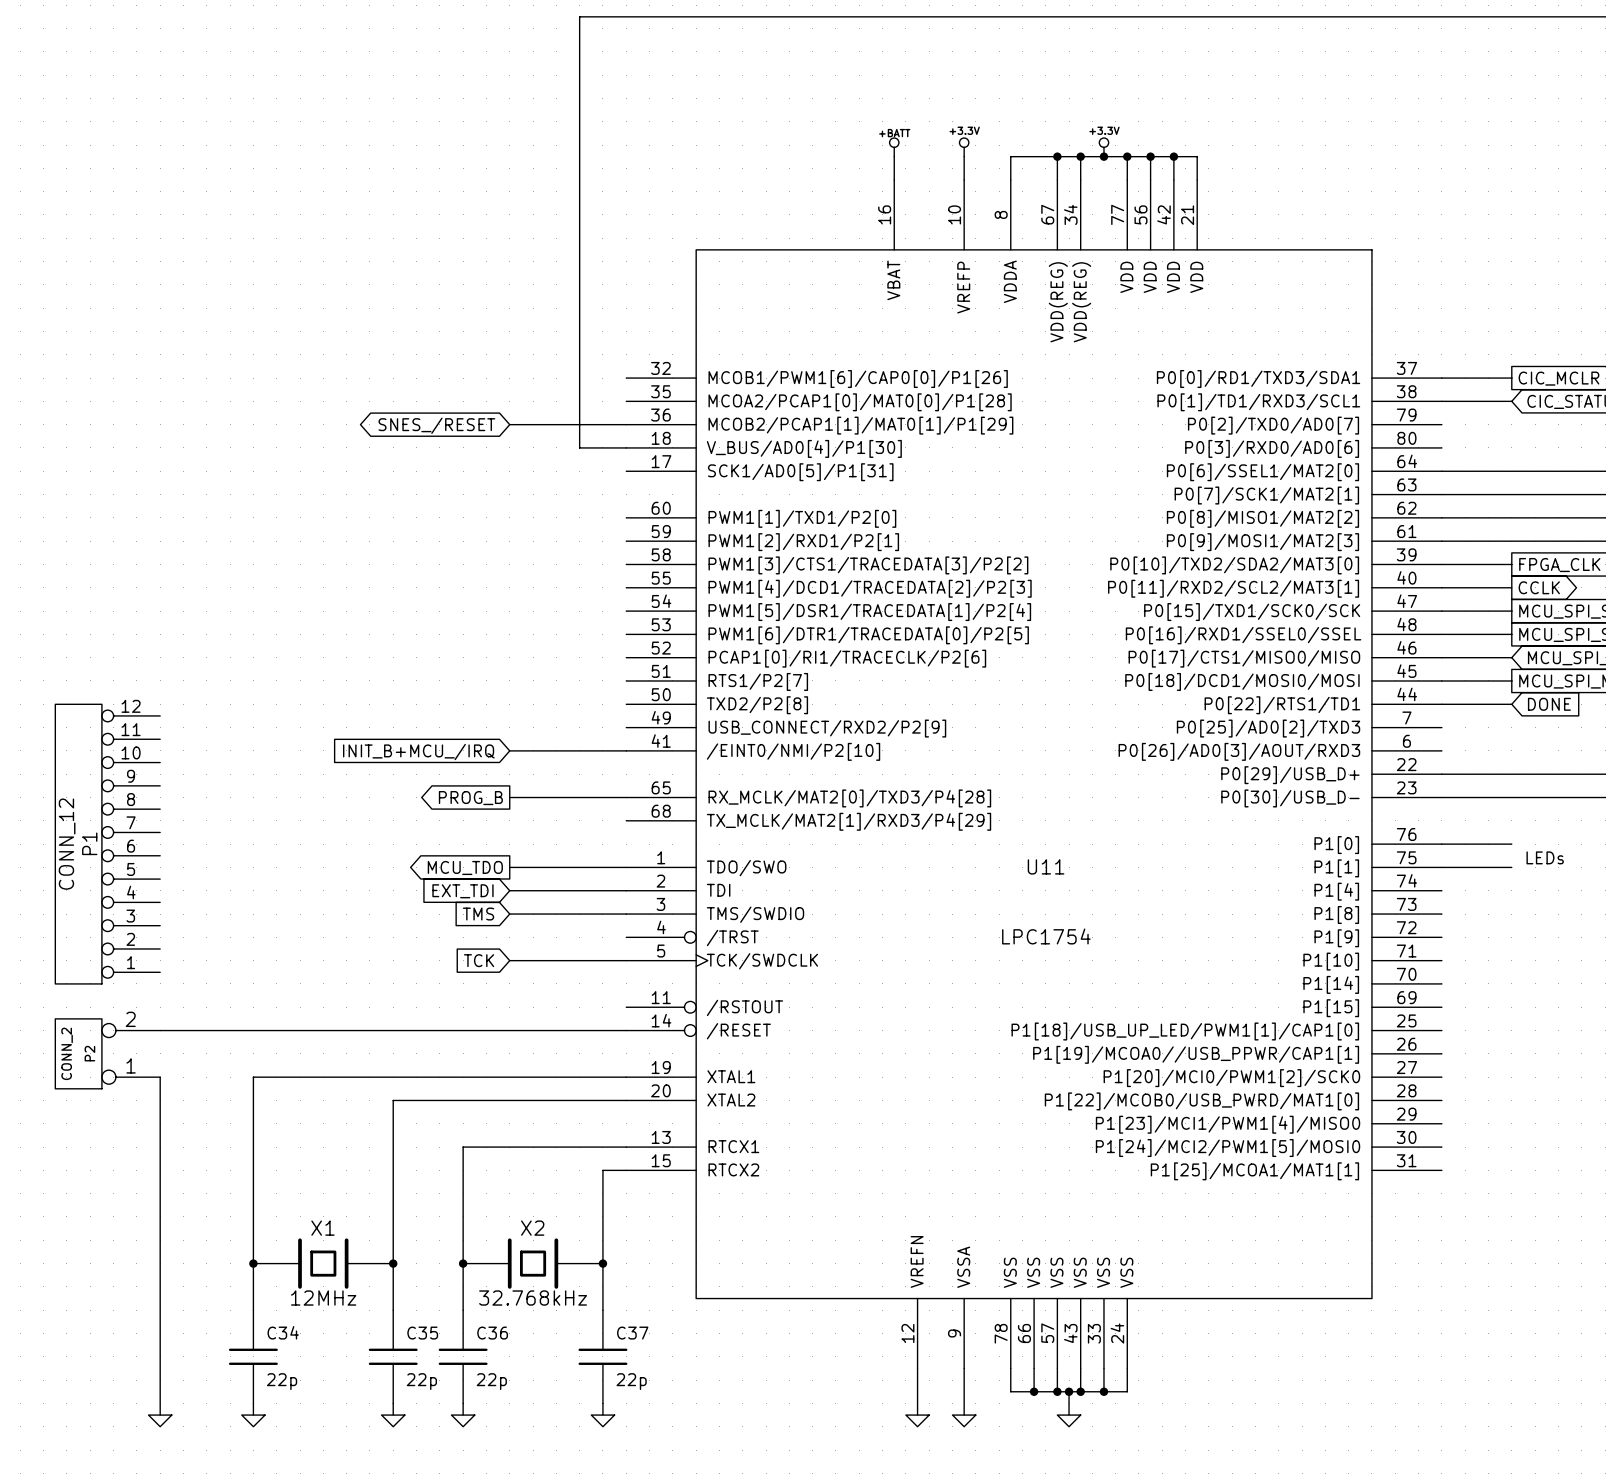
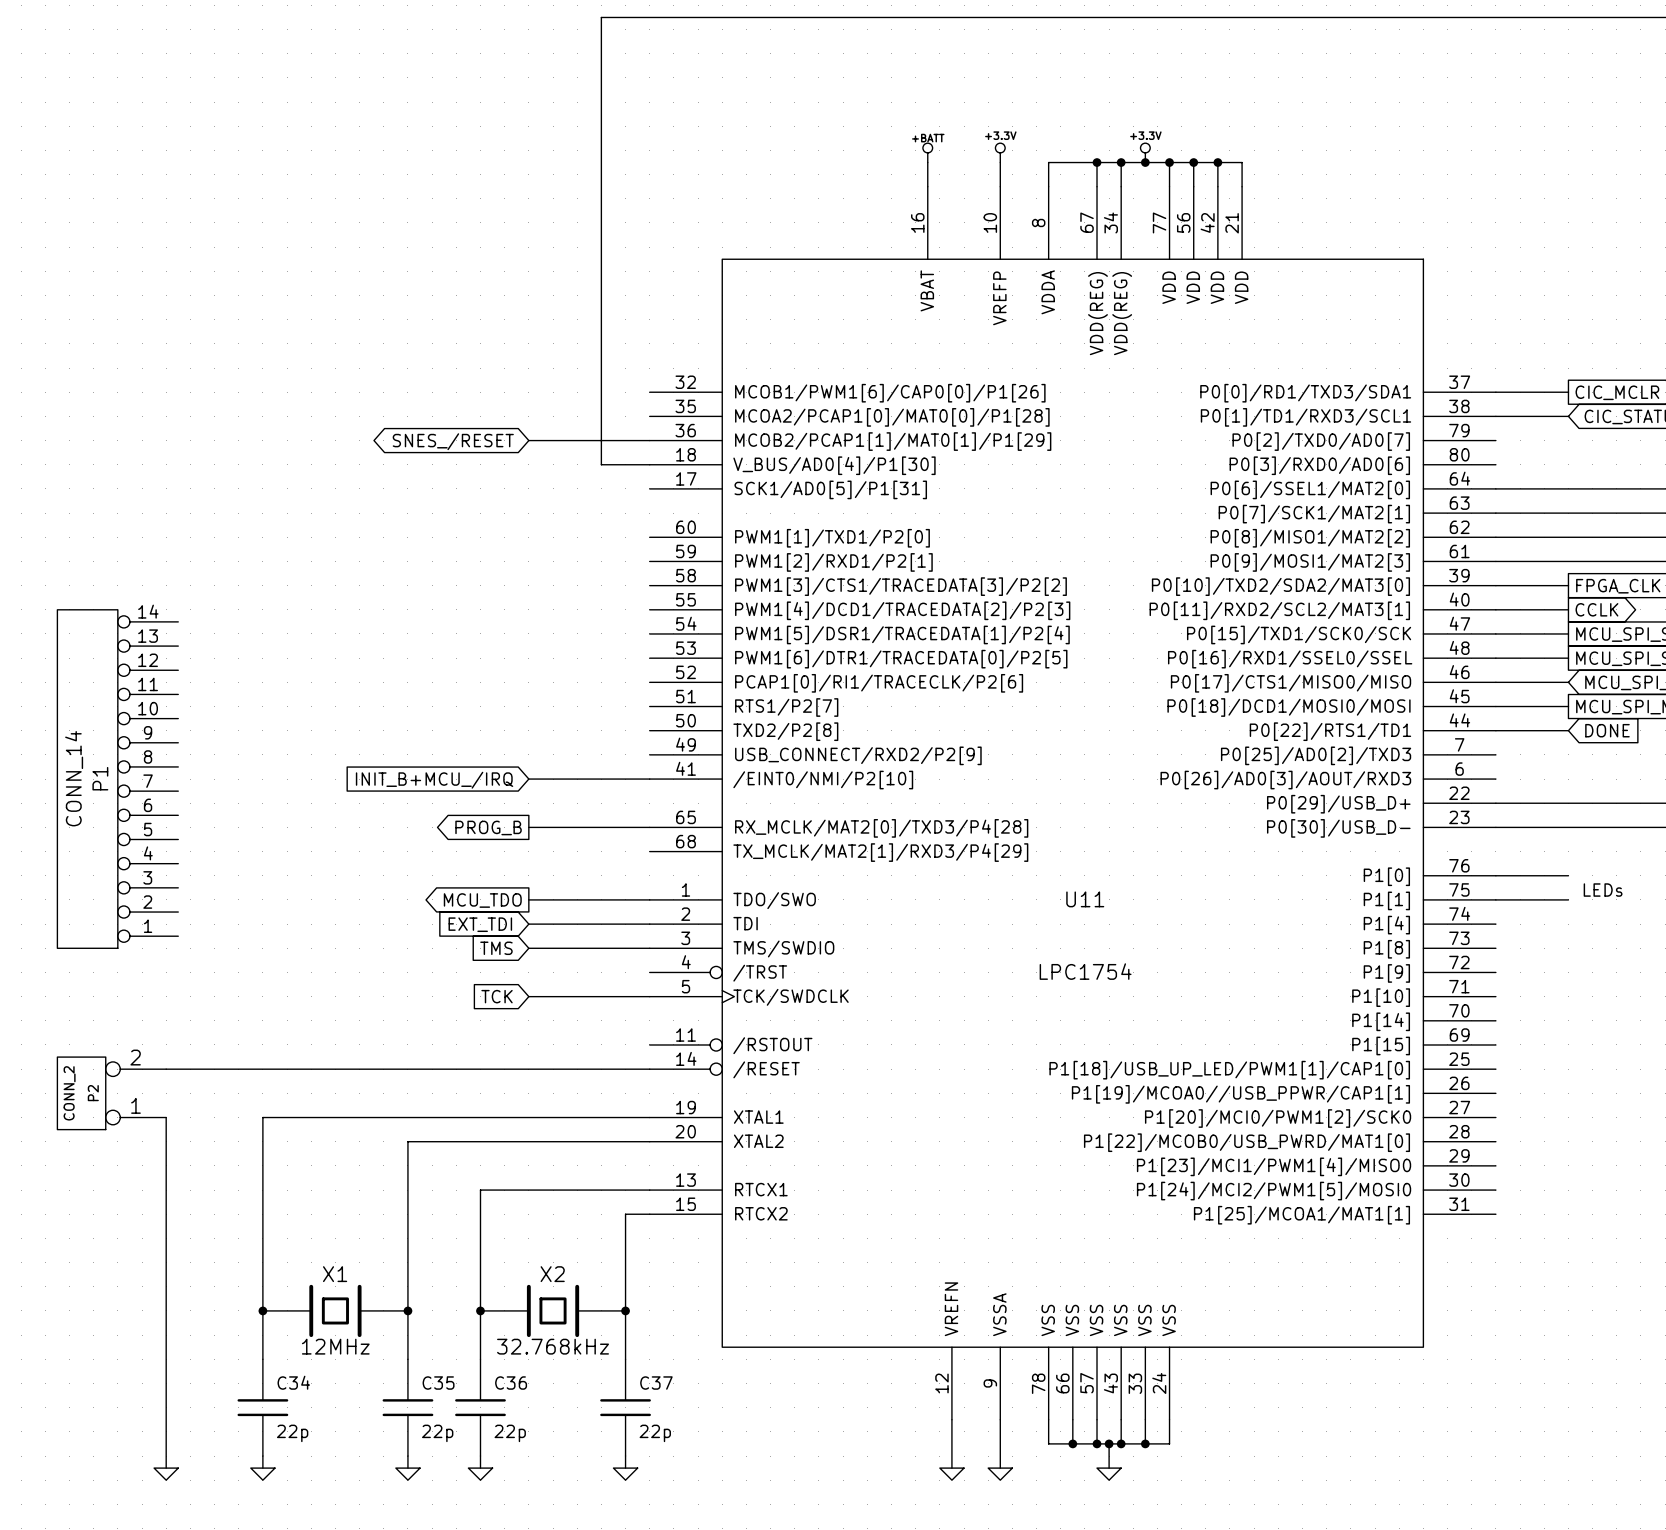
P1 symbol: [55, 704, 161, 984] -> [57, 609, 179, 949]
P1 value: CONN_12 (67, 844) -> CONN_14 (74, 778)

